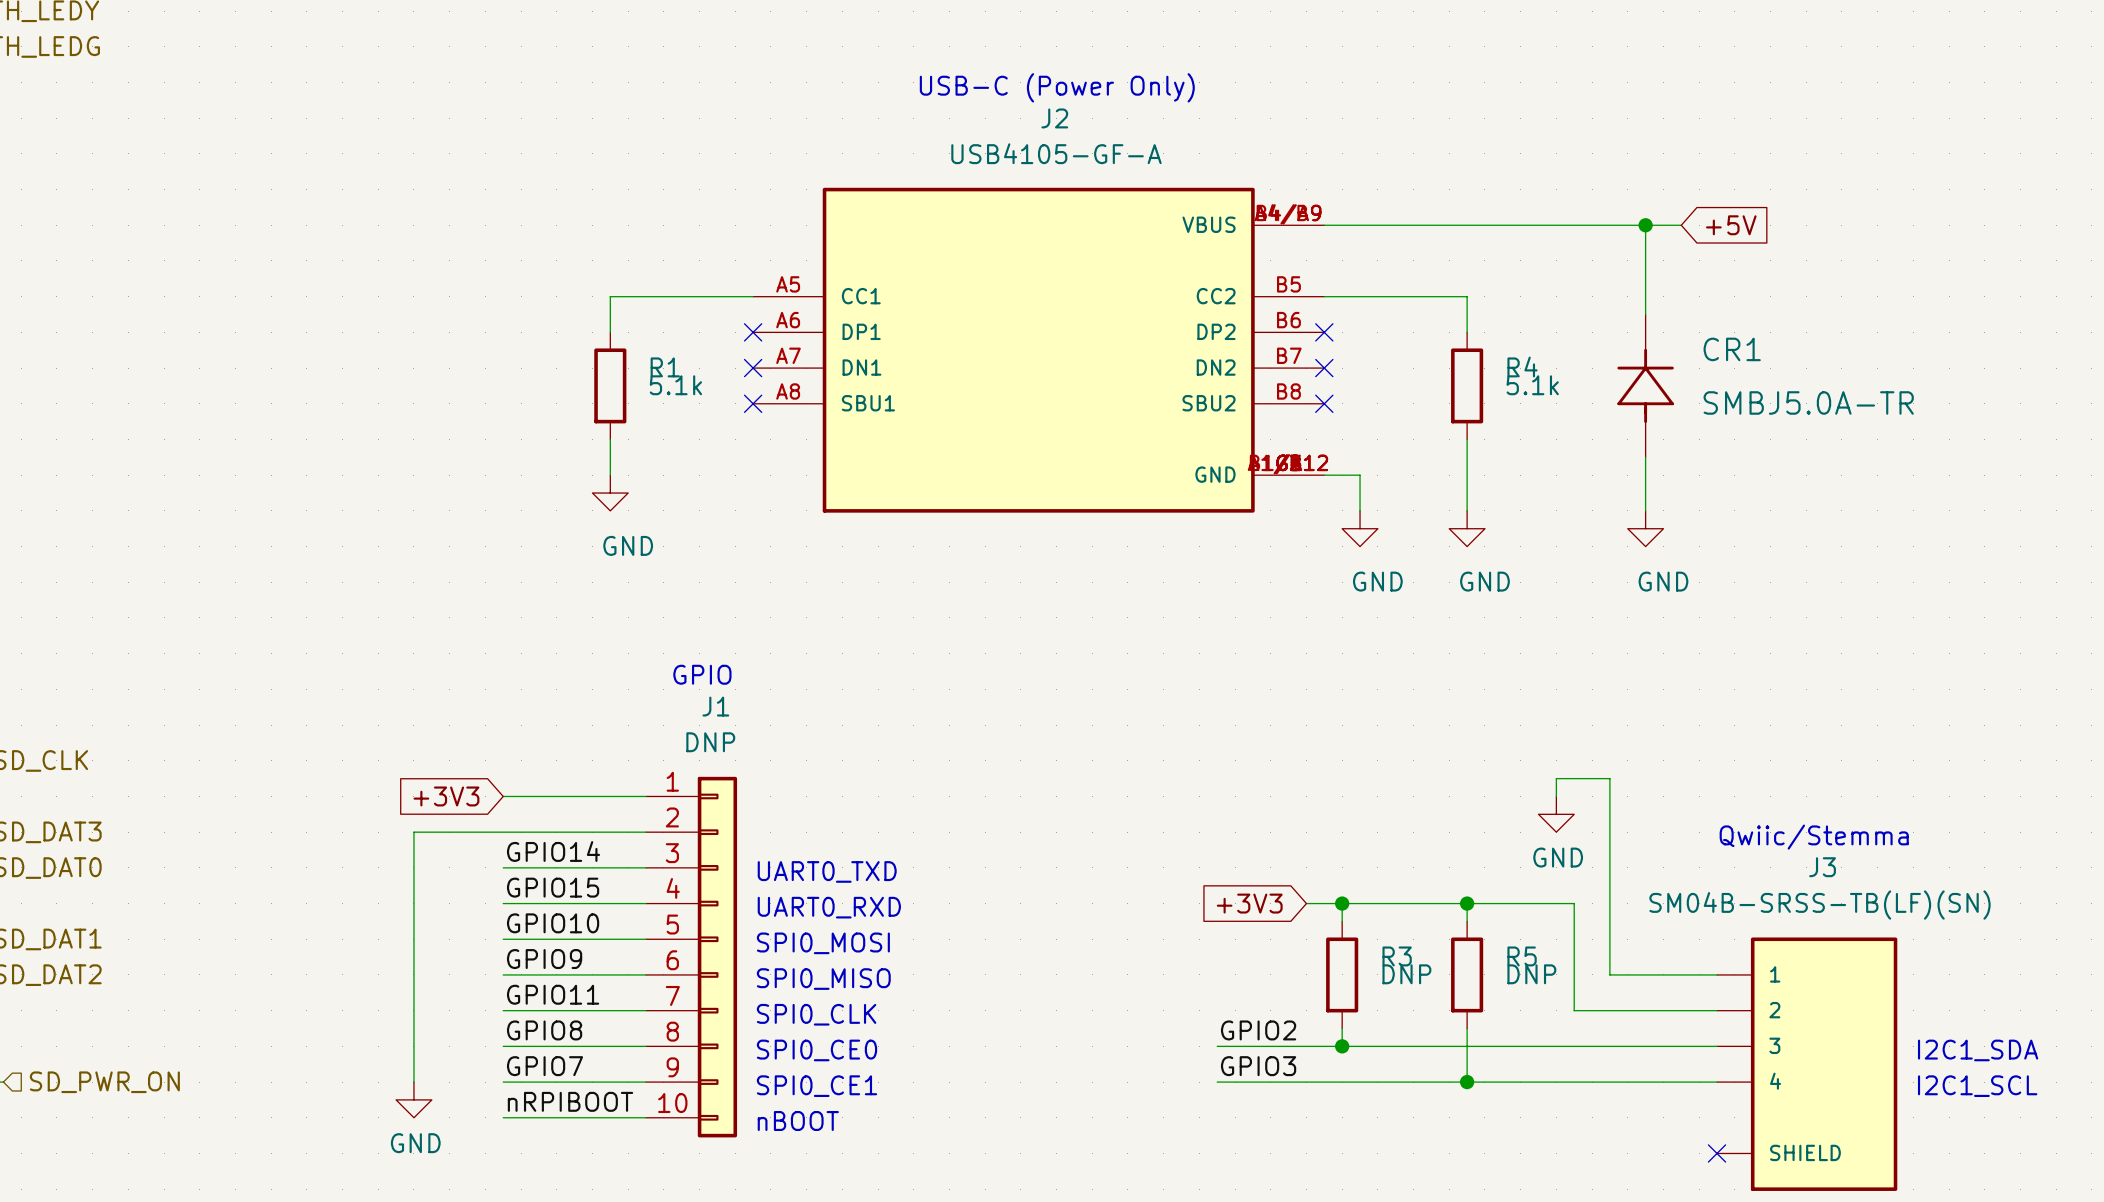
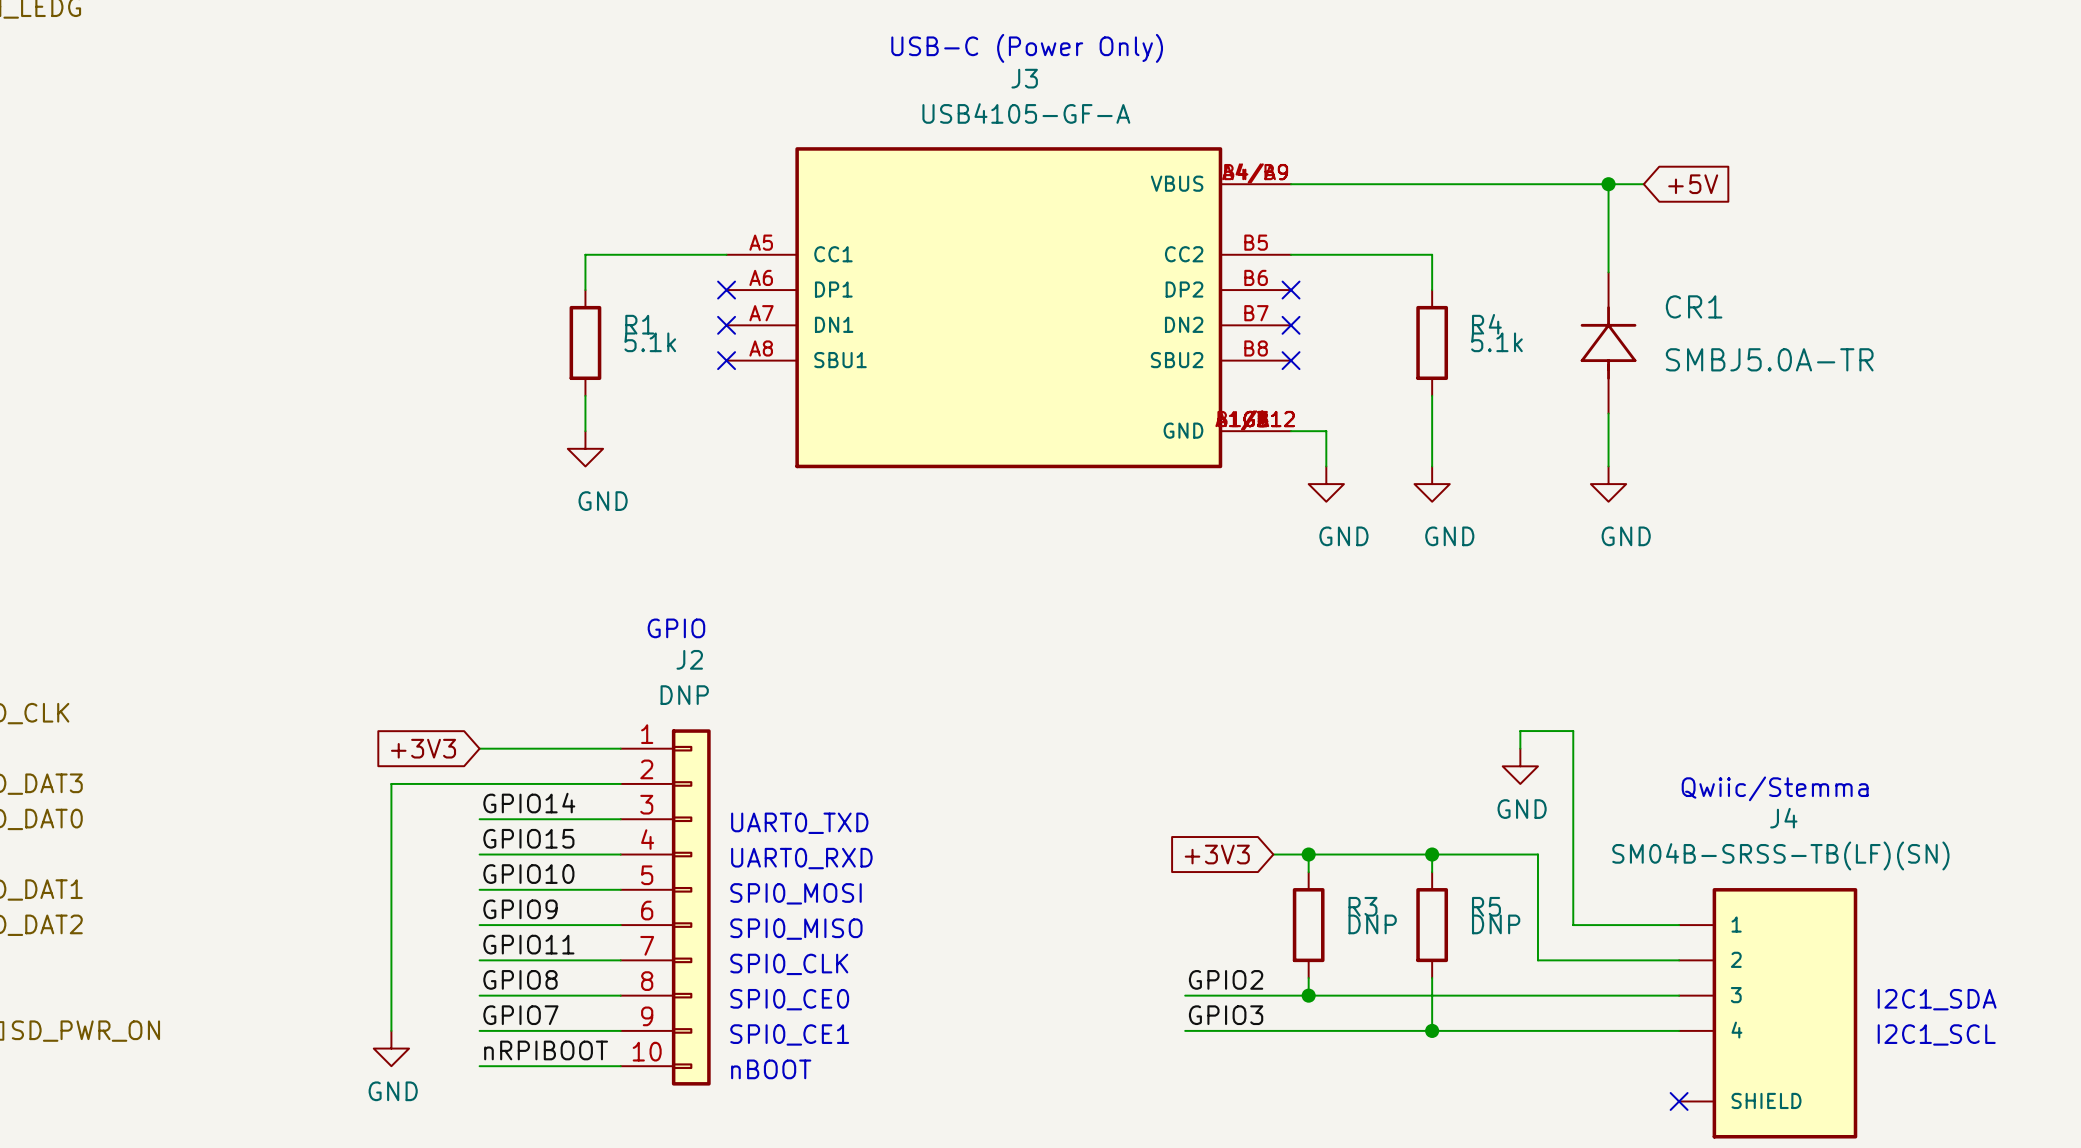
J2 name: J2 (1054, 118) -> J3 (1024, 78)
J1 name: J1 (715, 706) -> J2 (689, 659)
J3 name: J3 (1822, 867) -> J4 (1783, 818)

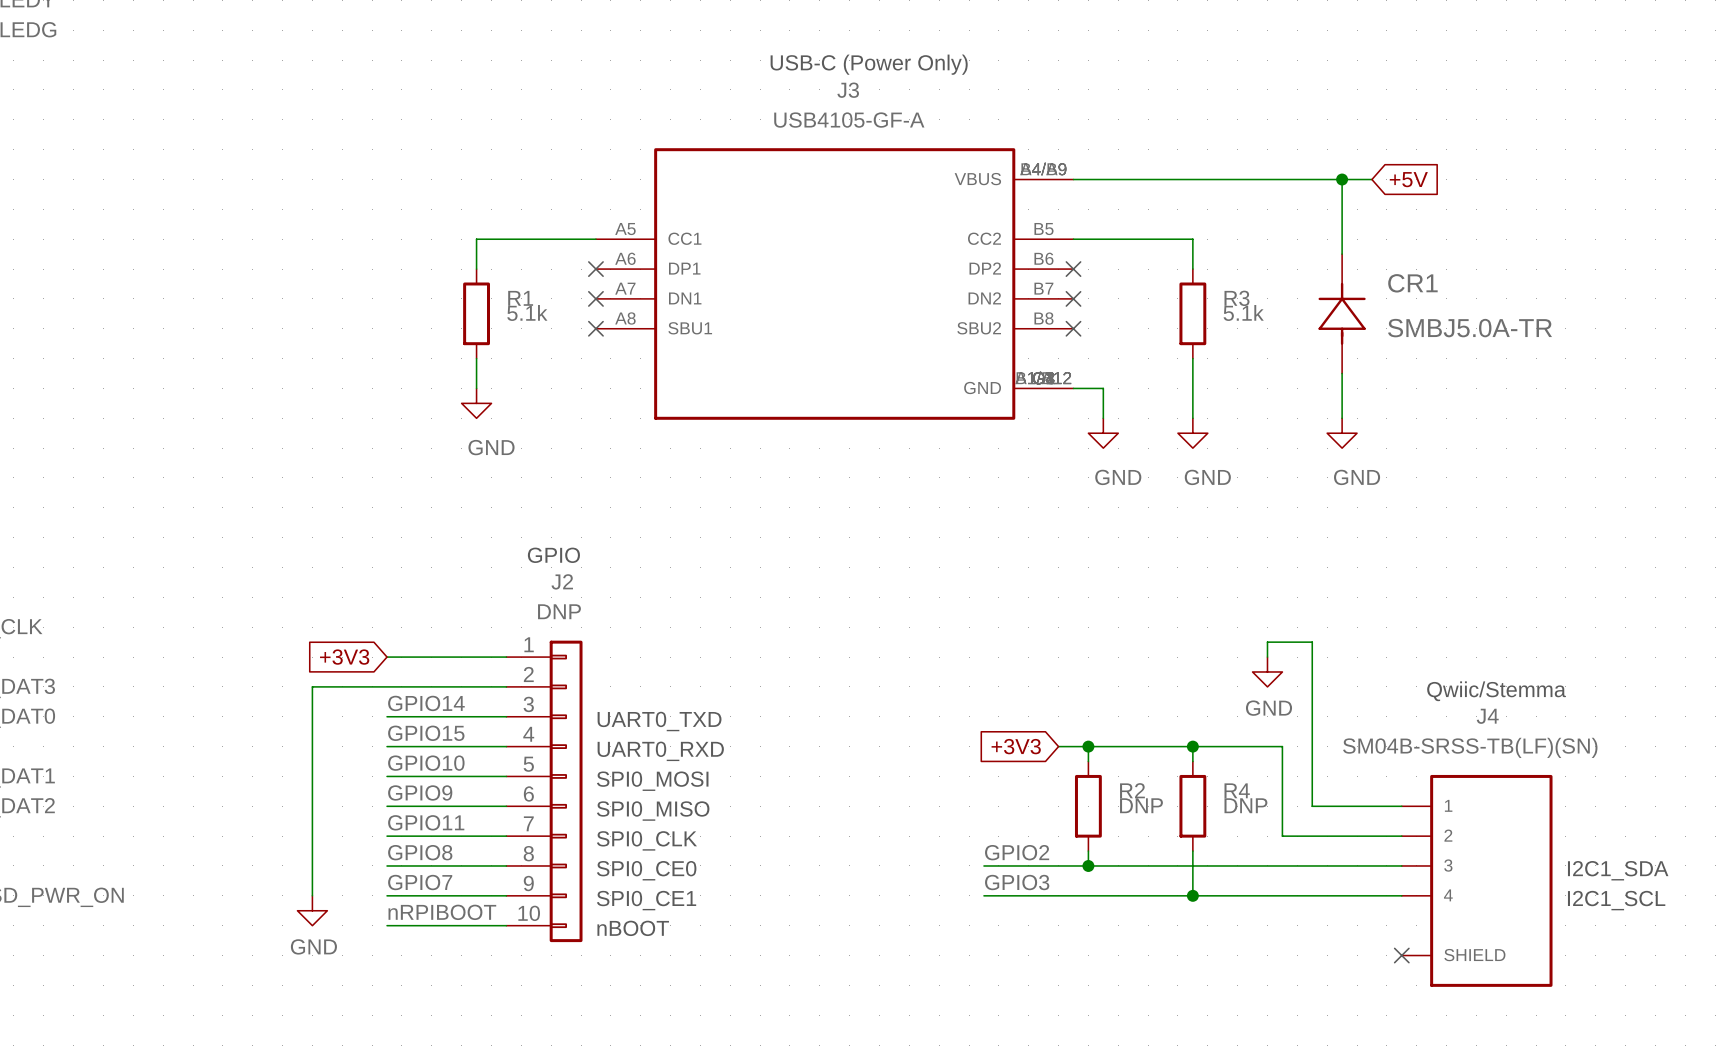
R4 name: R4 (1486, 324) -> R3 (1236, 298)
R3 name: R3 (1362, 906) -> R2 (1132, 790)
R5 name: R5 (1486, 906) -> R4 (1237, 790)

